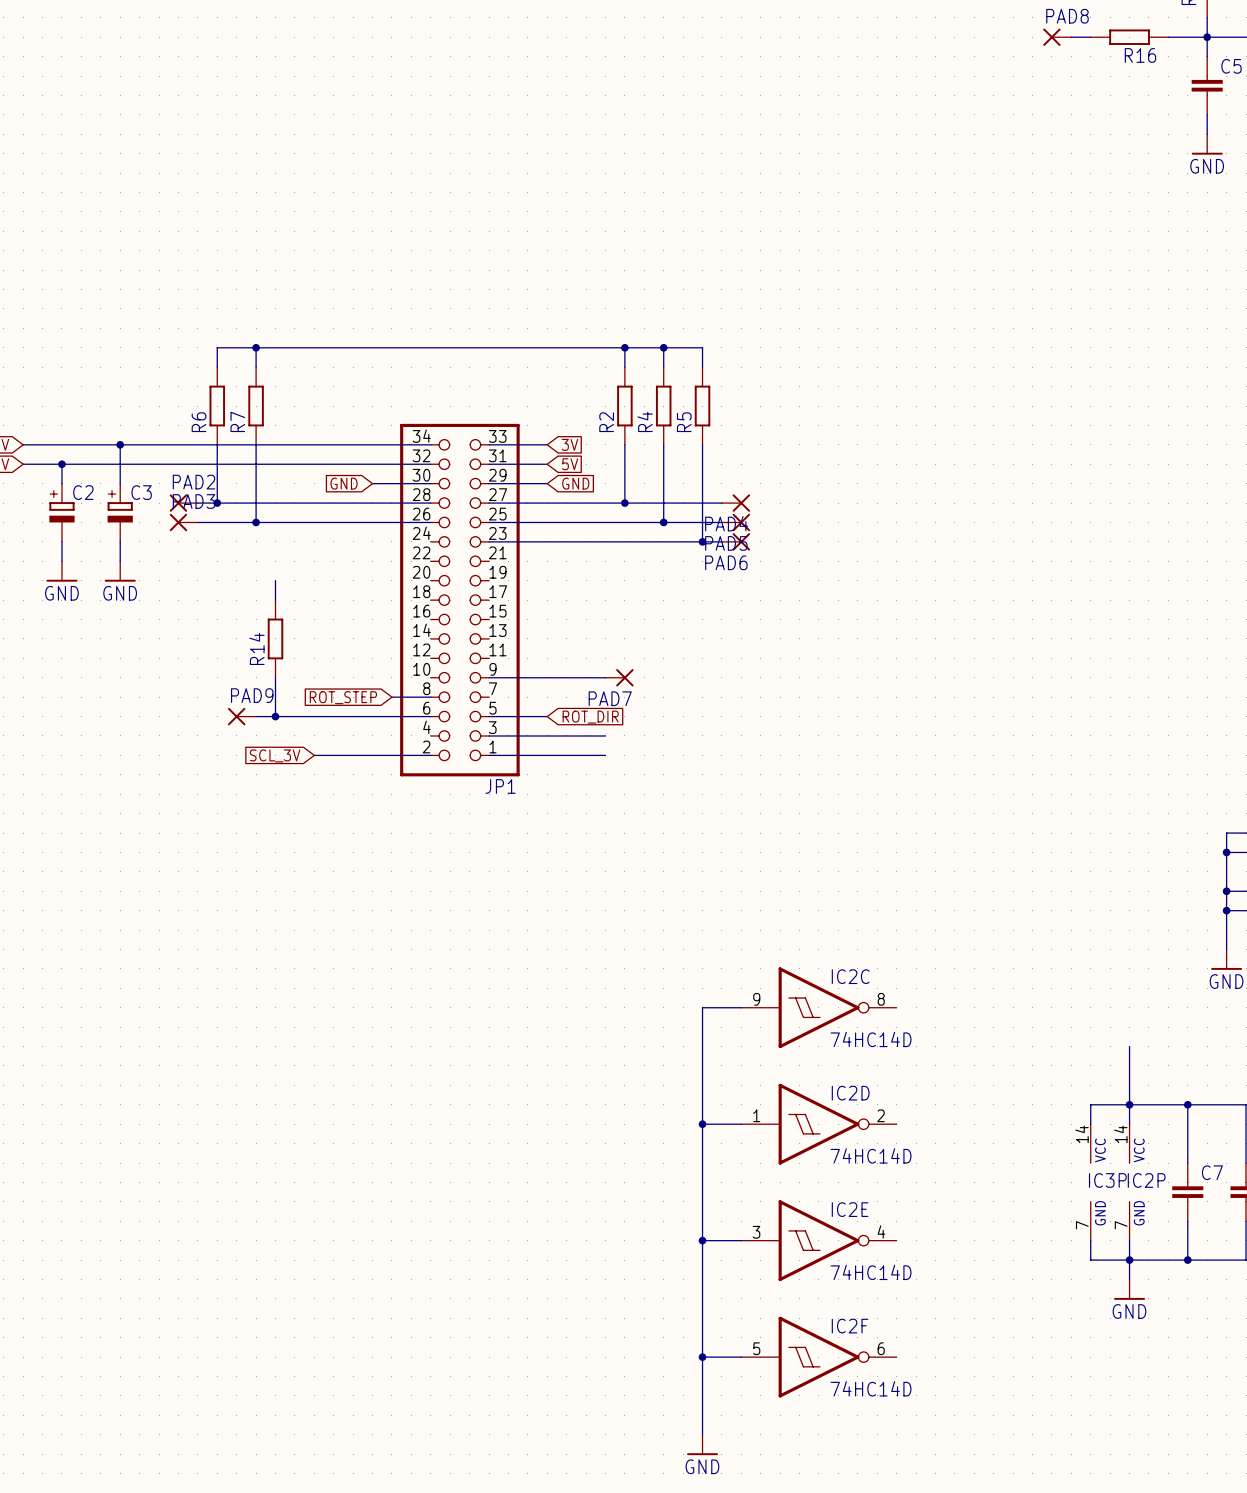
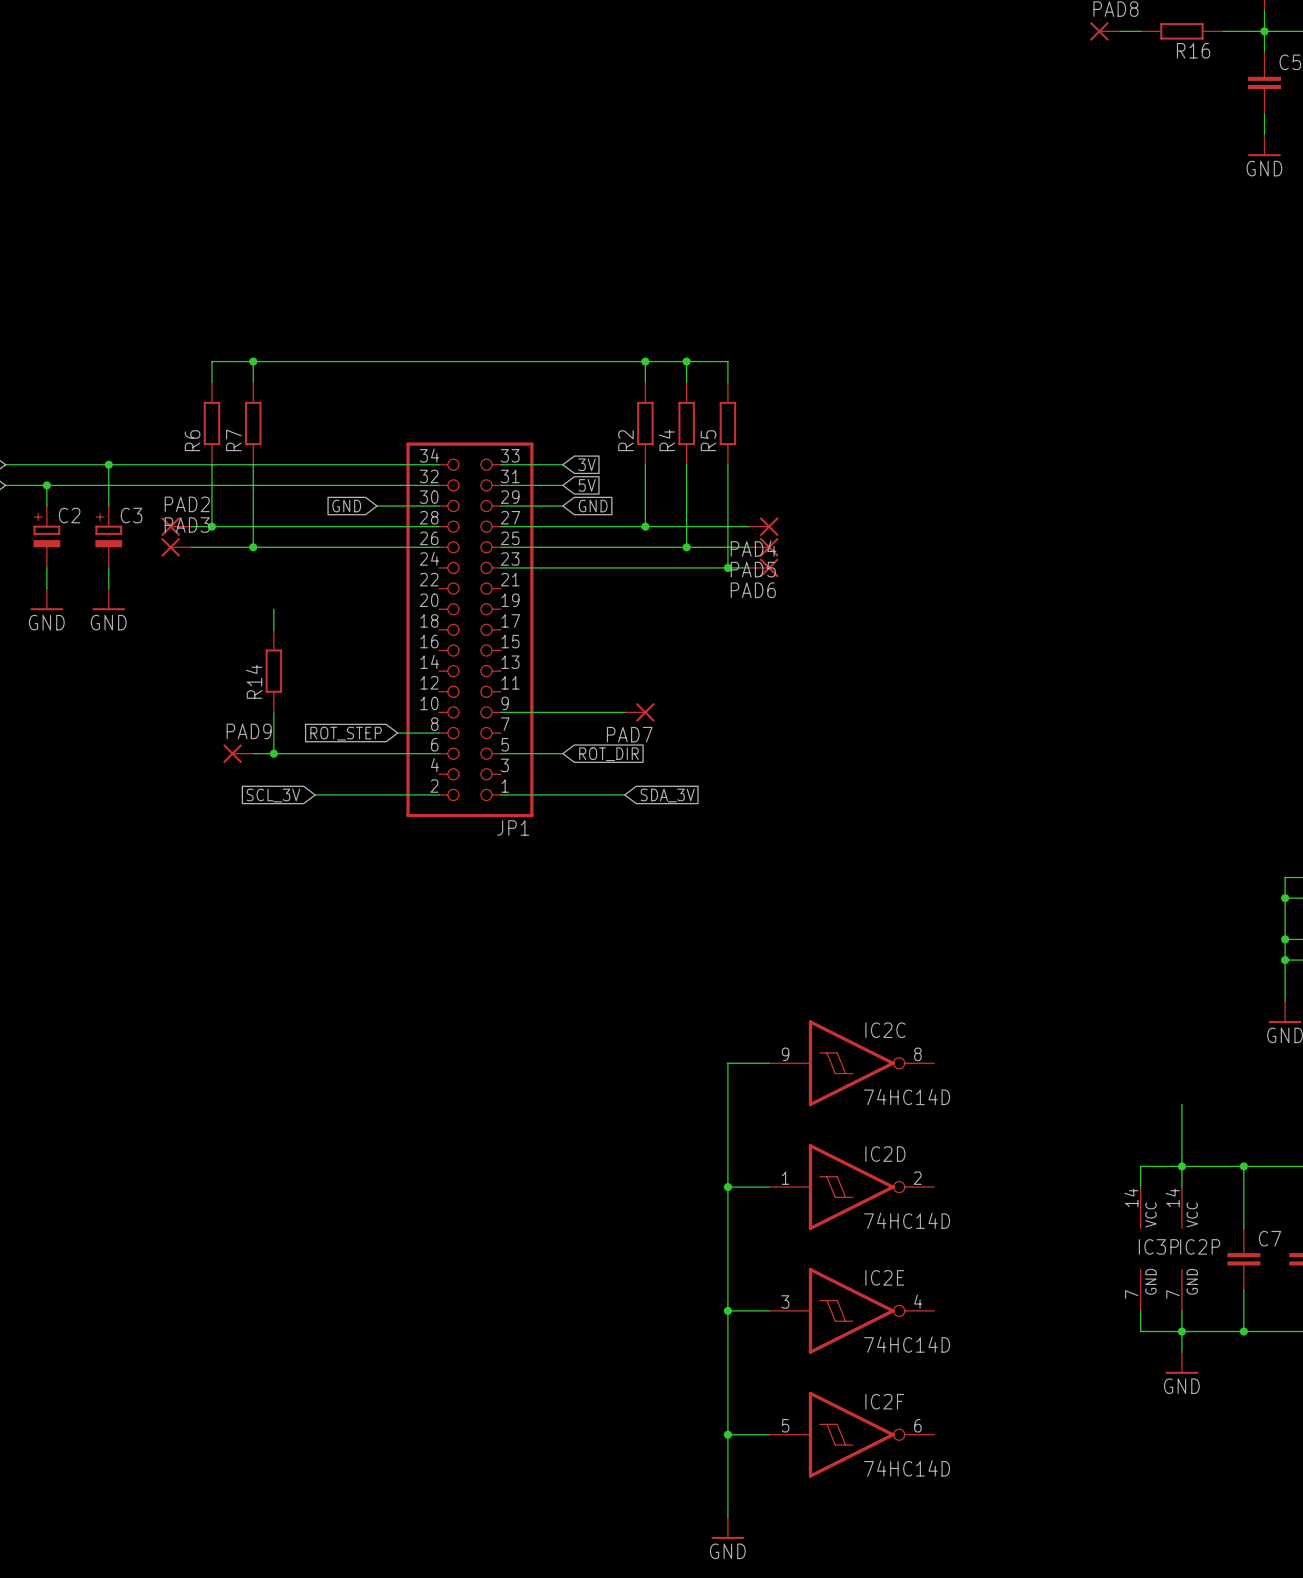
wire: (489, 735) (605, 735) -> none
global label: none -> SDA_3V (667, 795)

